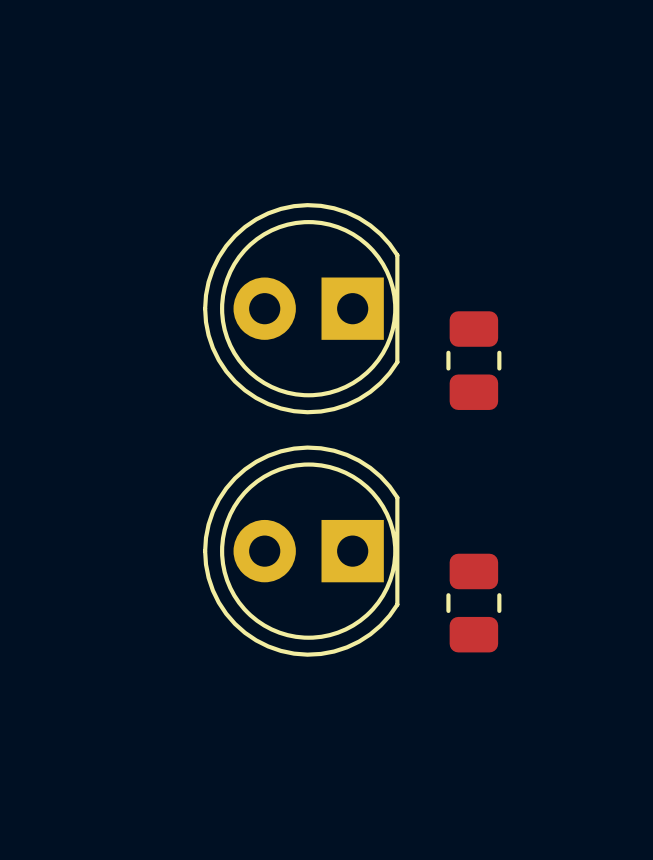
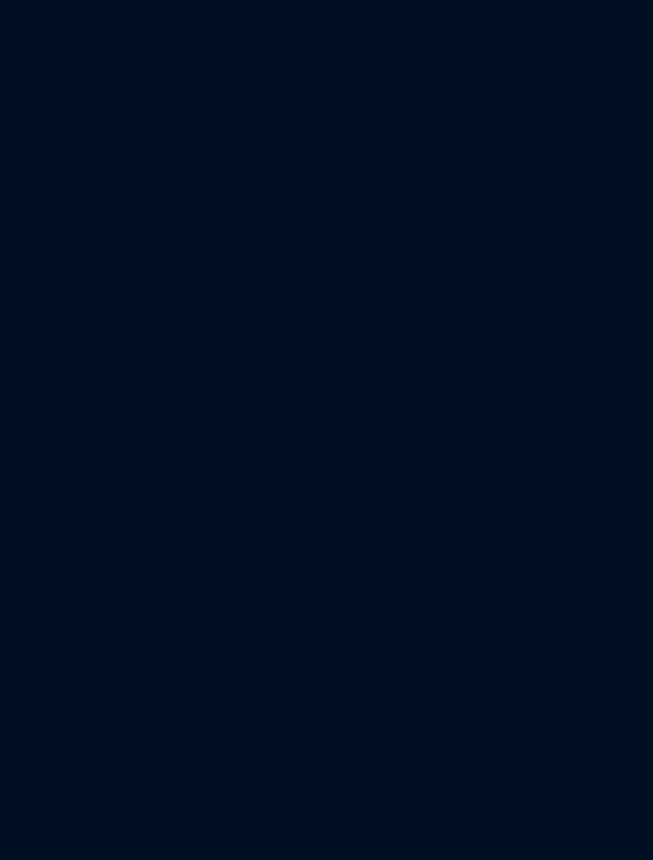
part: (301, 308) -> none
part: (473, 360) -> none
part: (301, 551) -> none
part: (473, 603) -> none

